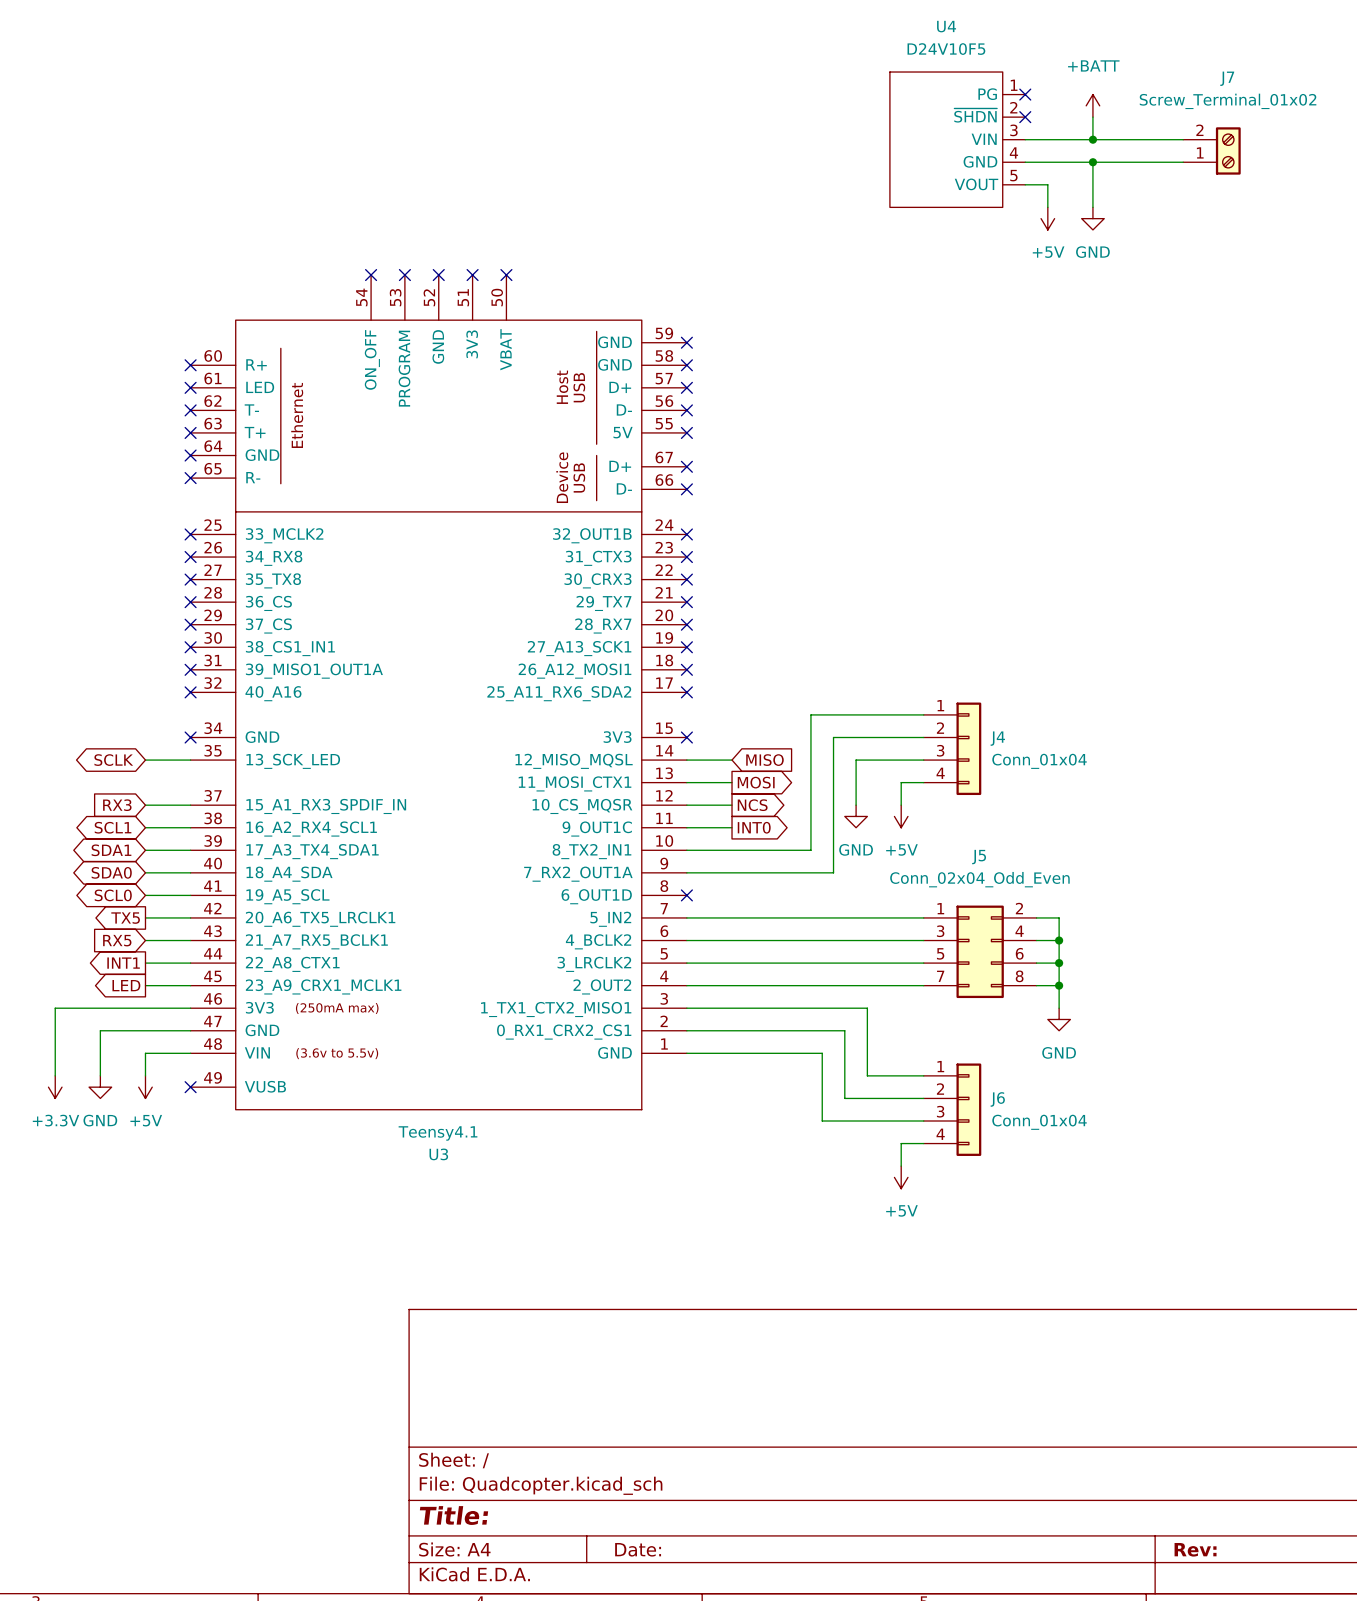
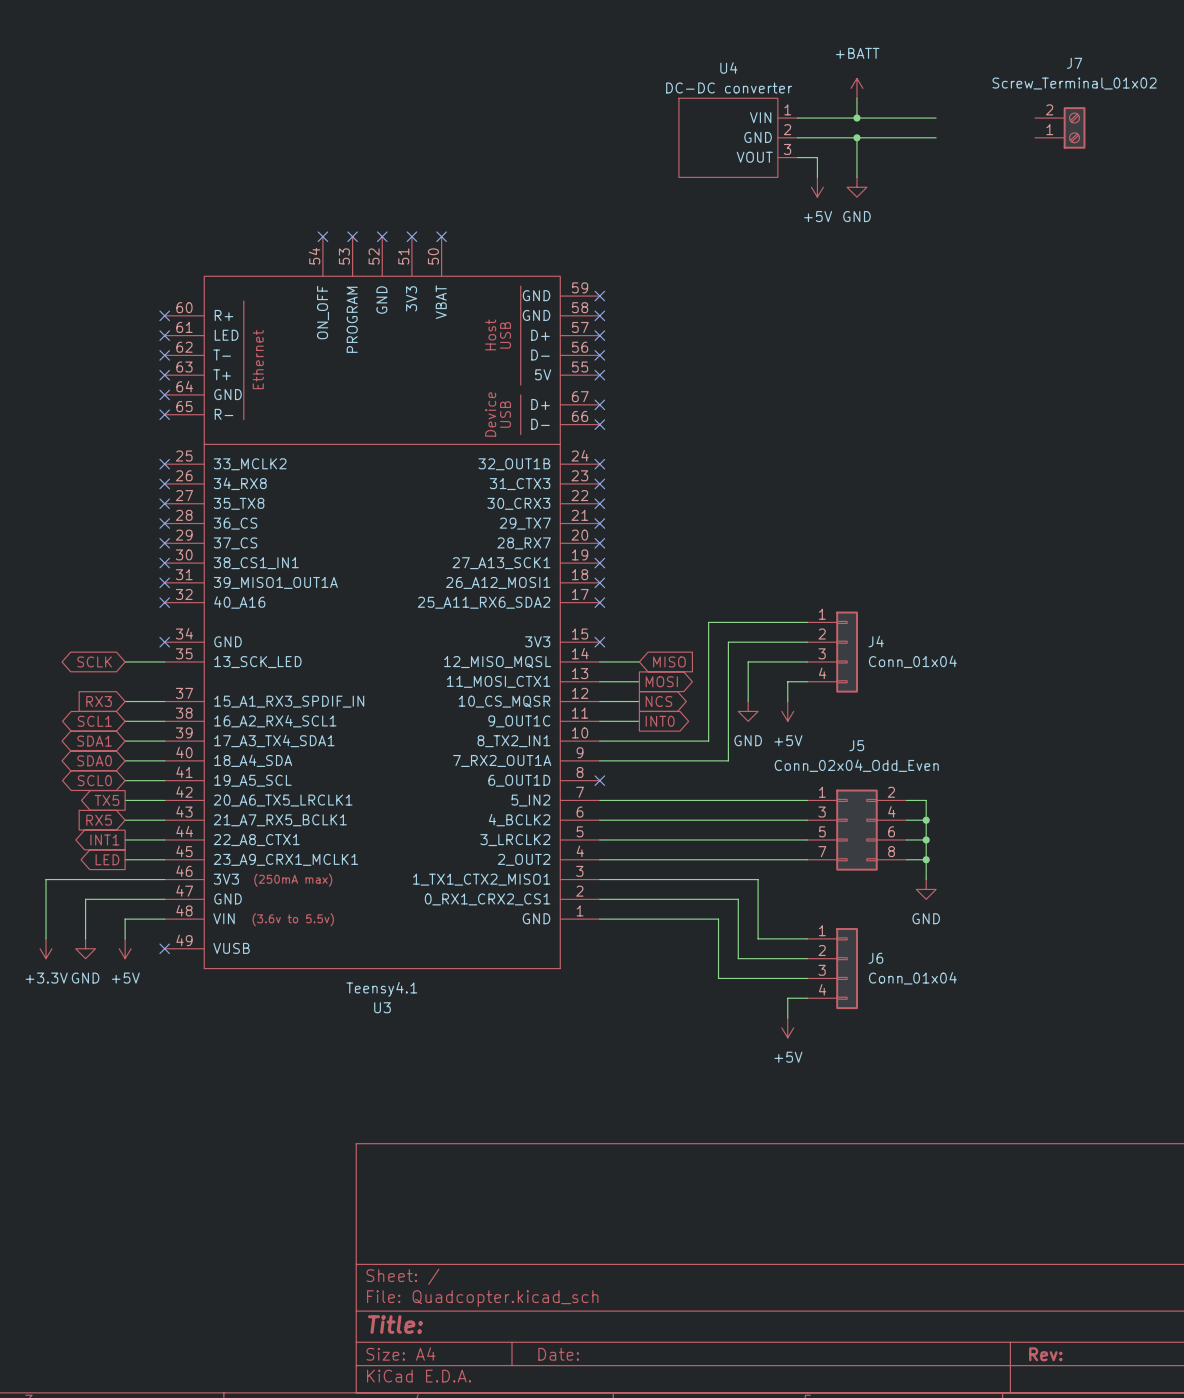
U4 name position: U4 (946, 26) -> U4 (728, 67)
U4 value: D24V10F5 (946, 49) -> DC-DC converter (729, 87)
U4 symbol: [889, 72, 1026, 208] -> [678, 98, 798, 178]
no-connect mark: (1025, 94) -> none
power symbol position: +BATT (1092, 105) -> +BATT (856, 88)
no-connect mark: (1025, 117) -> none
wire: (1092, 117) (1092, 139) -> (856, 98) (856, 118)
junction: none -> (856, 118)
wire: (1070, 139) (1183, 139) -> (797, 118) (896, 118)
junction: (1092, 139) -> none
junction: none -> (856, 137)
wire: (1070, 162) (1183, 162) -> (797, 137) (896, 137)
wire: (1092, 162) (1092, 207) -> (856, 137) (856, 177)
junction: (1092, 162) -> none
wire: (1025, 184) (1047, 184) (1047, 207) -> (797, 157) (817, 157) (817, 177)
power symbol position: +5V (1047, 218) -> +5V (817, 187)
power symbol position: GND (1092, 218) -> GND (856, 187)

